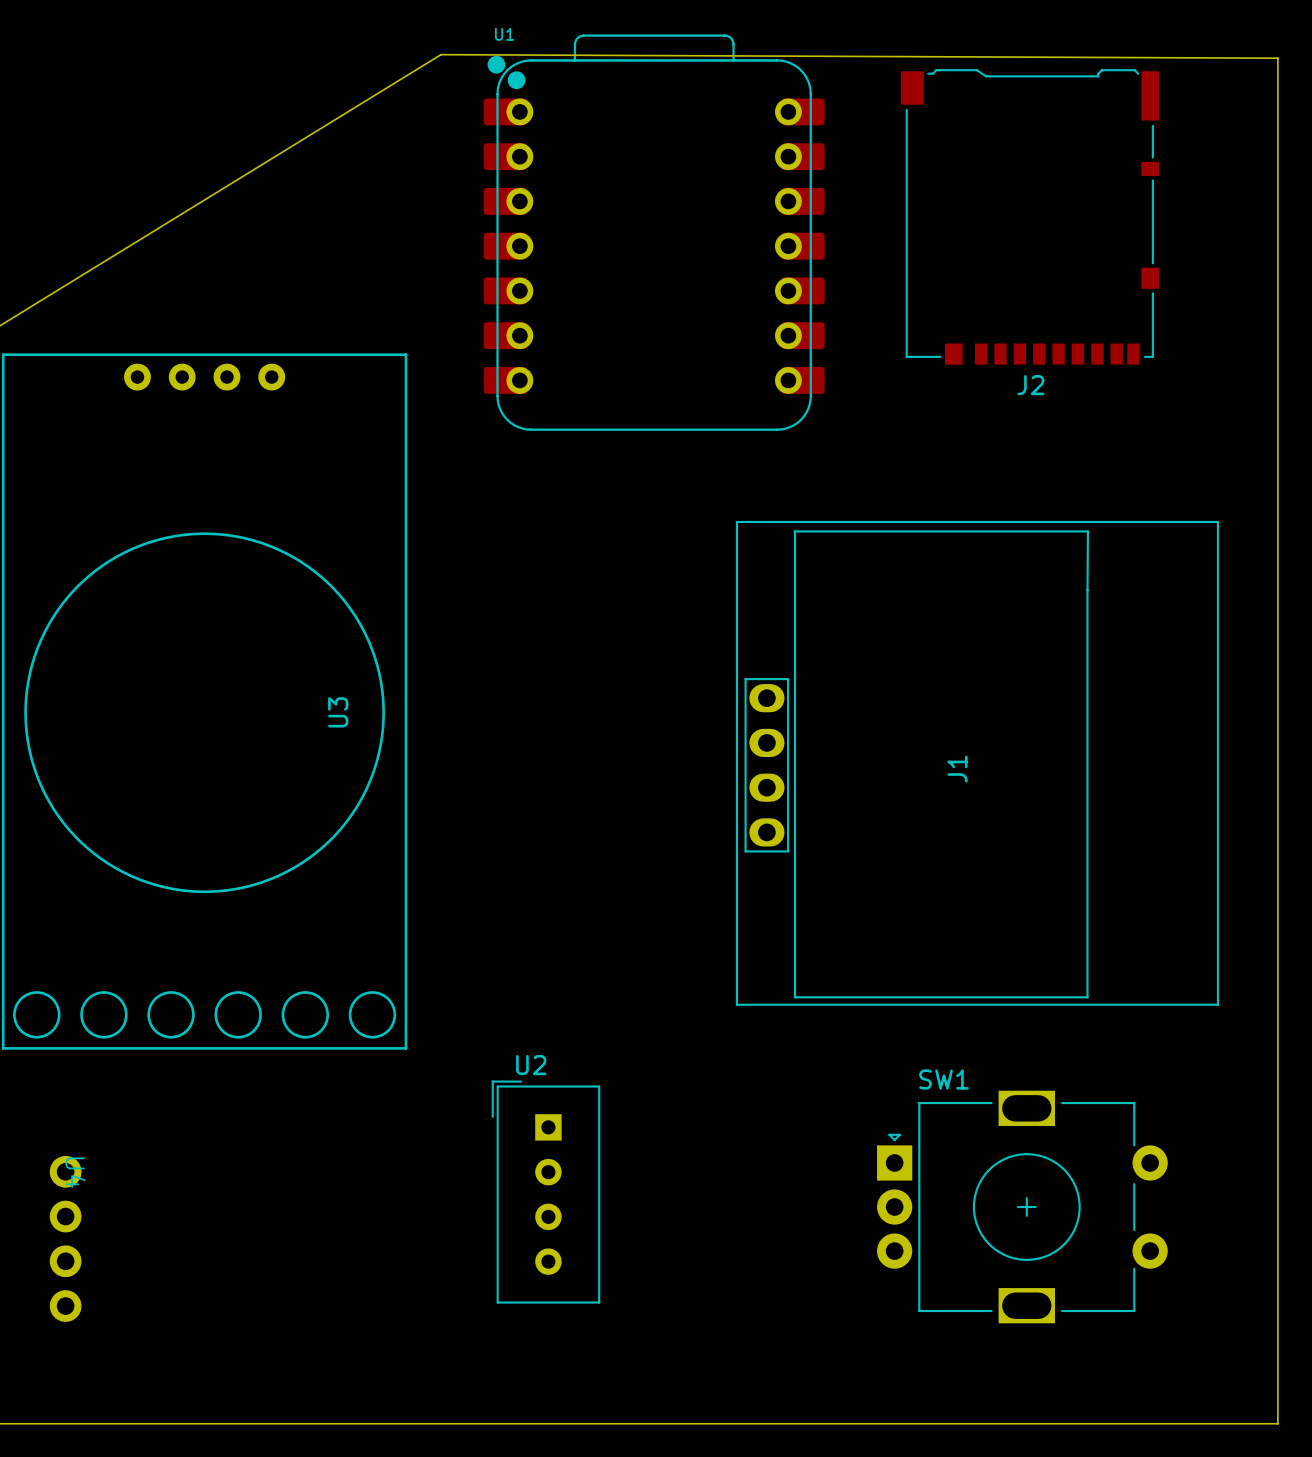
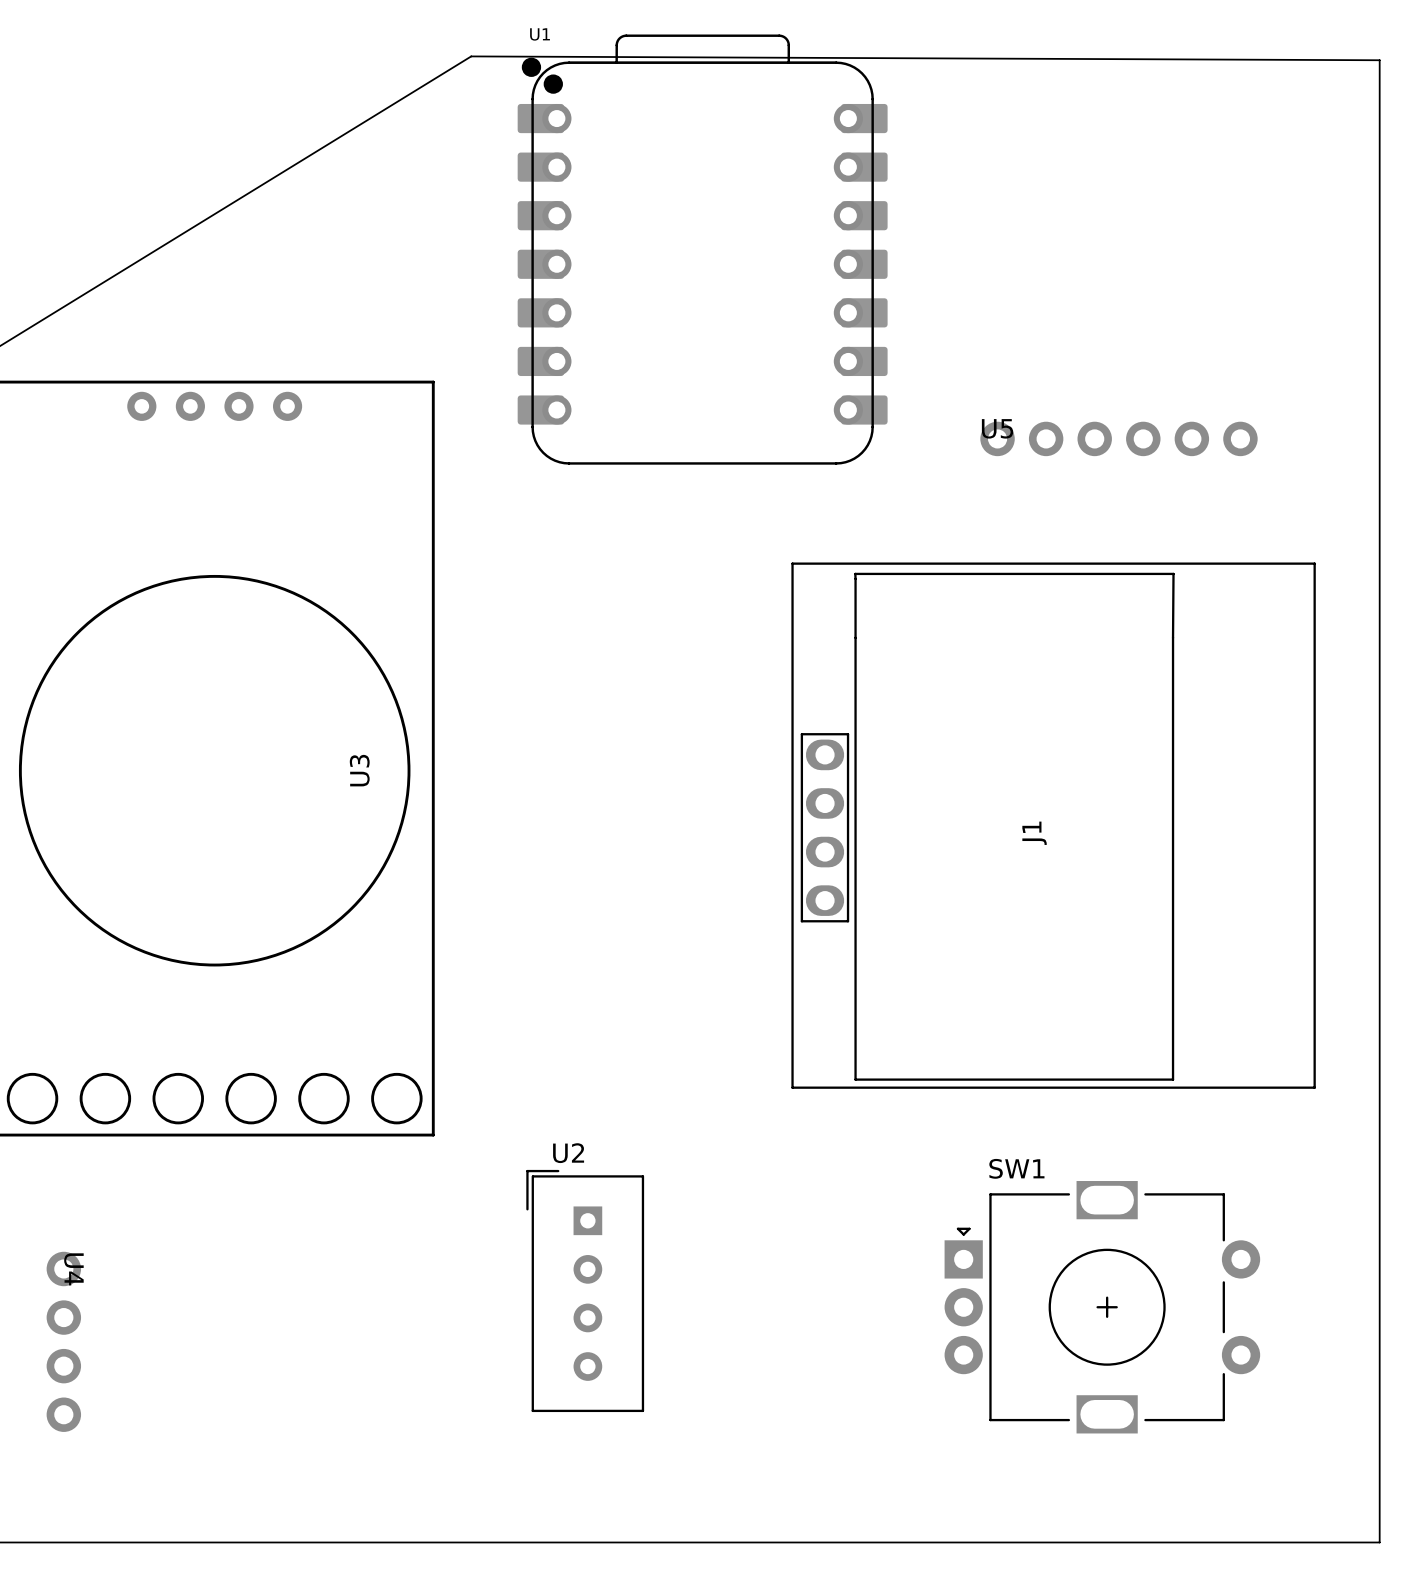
J2: (1029, 216) -> none
U5: none -> (1119, 438)

